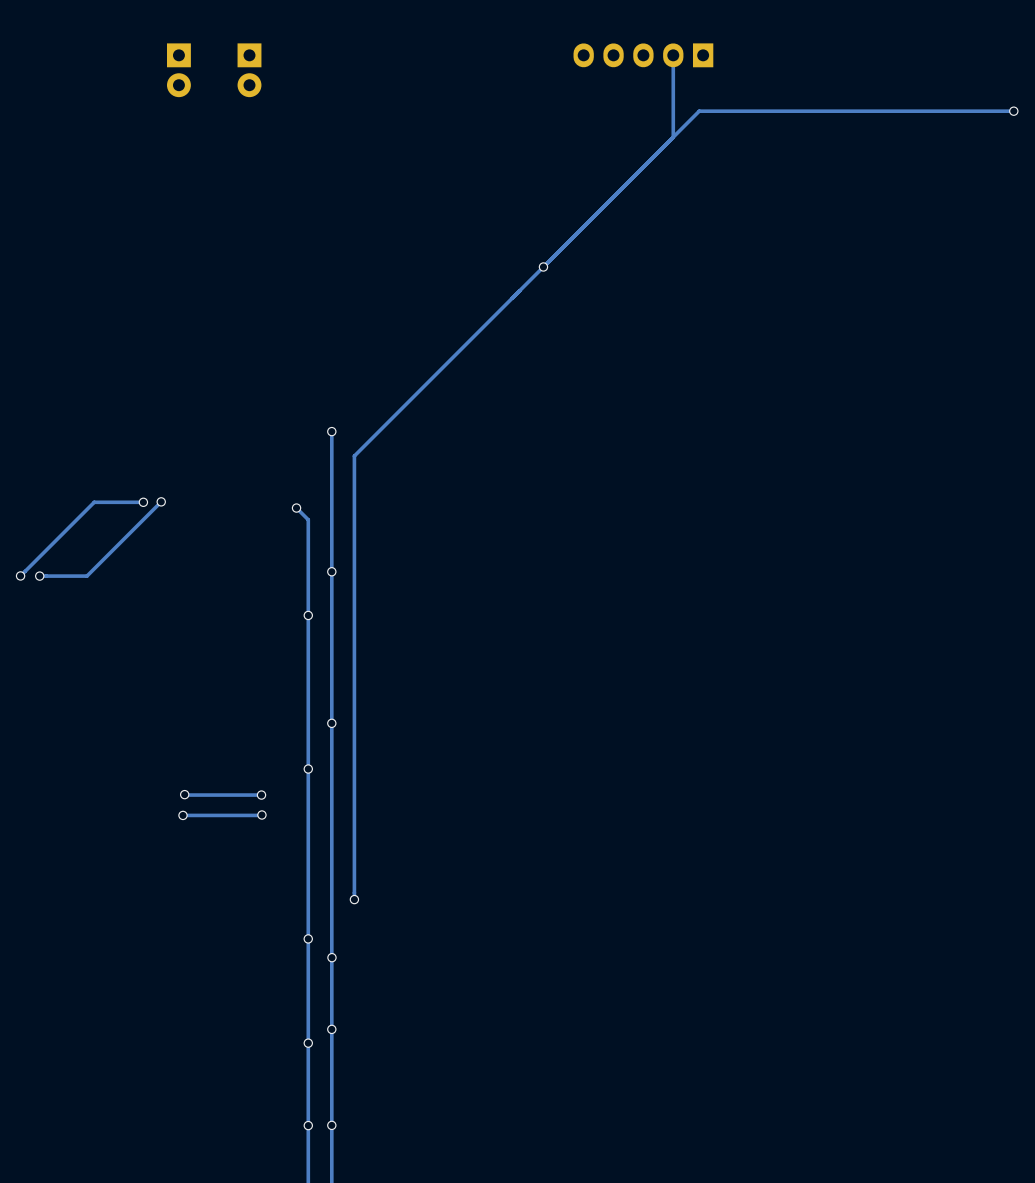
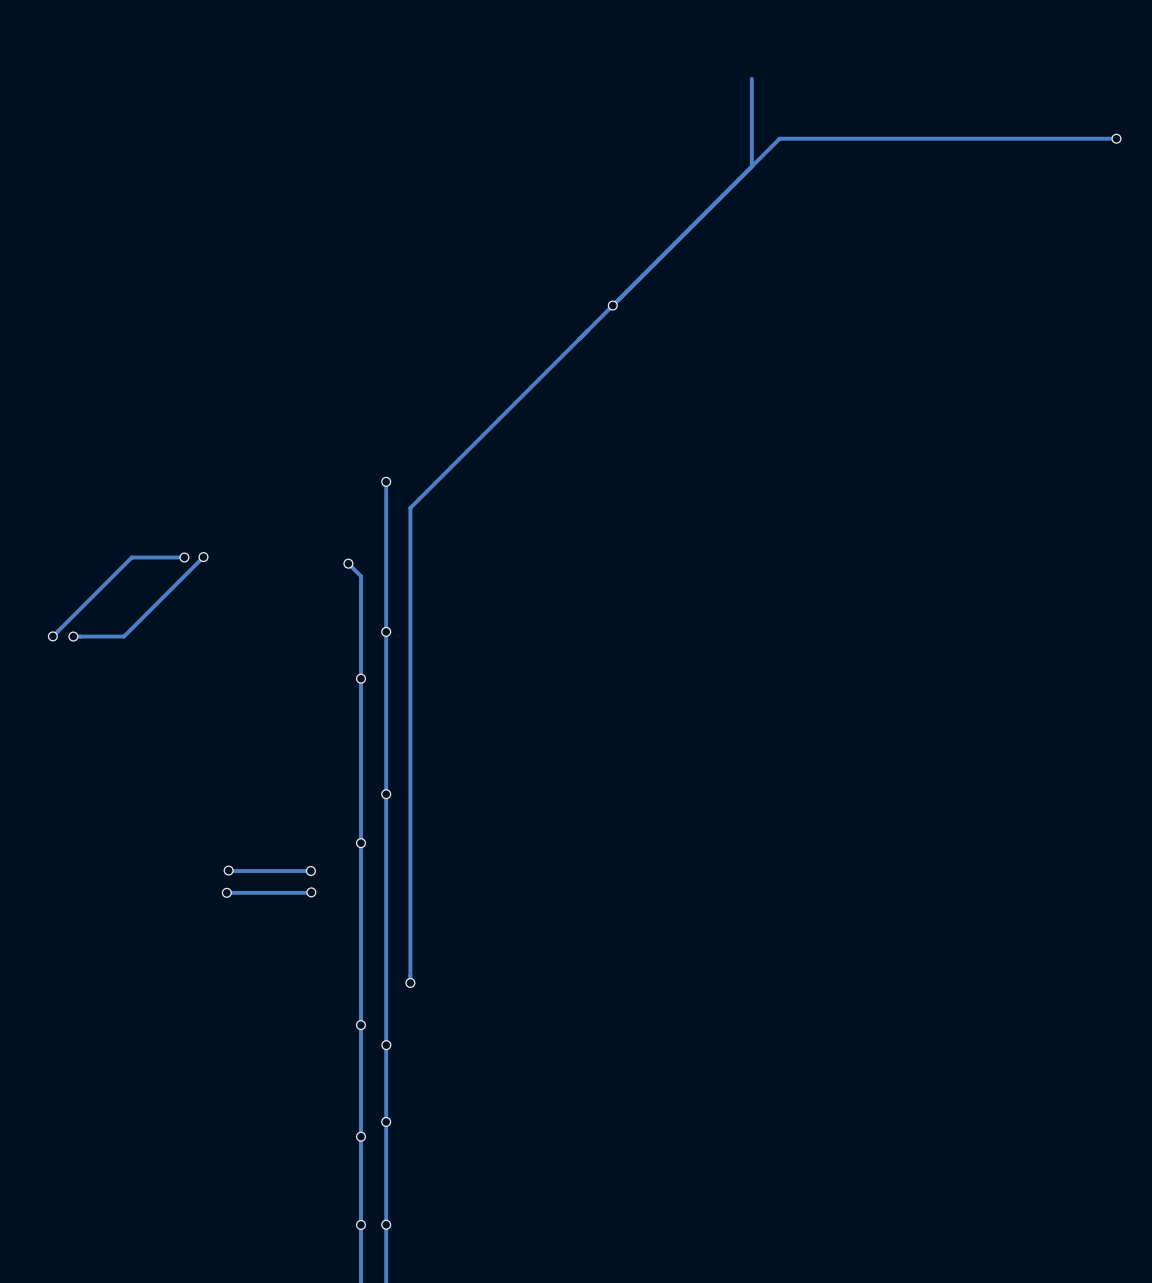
part: (643, 55) -> none
part: (178, 70) -> none
part: (249, 70) -> none

